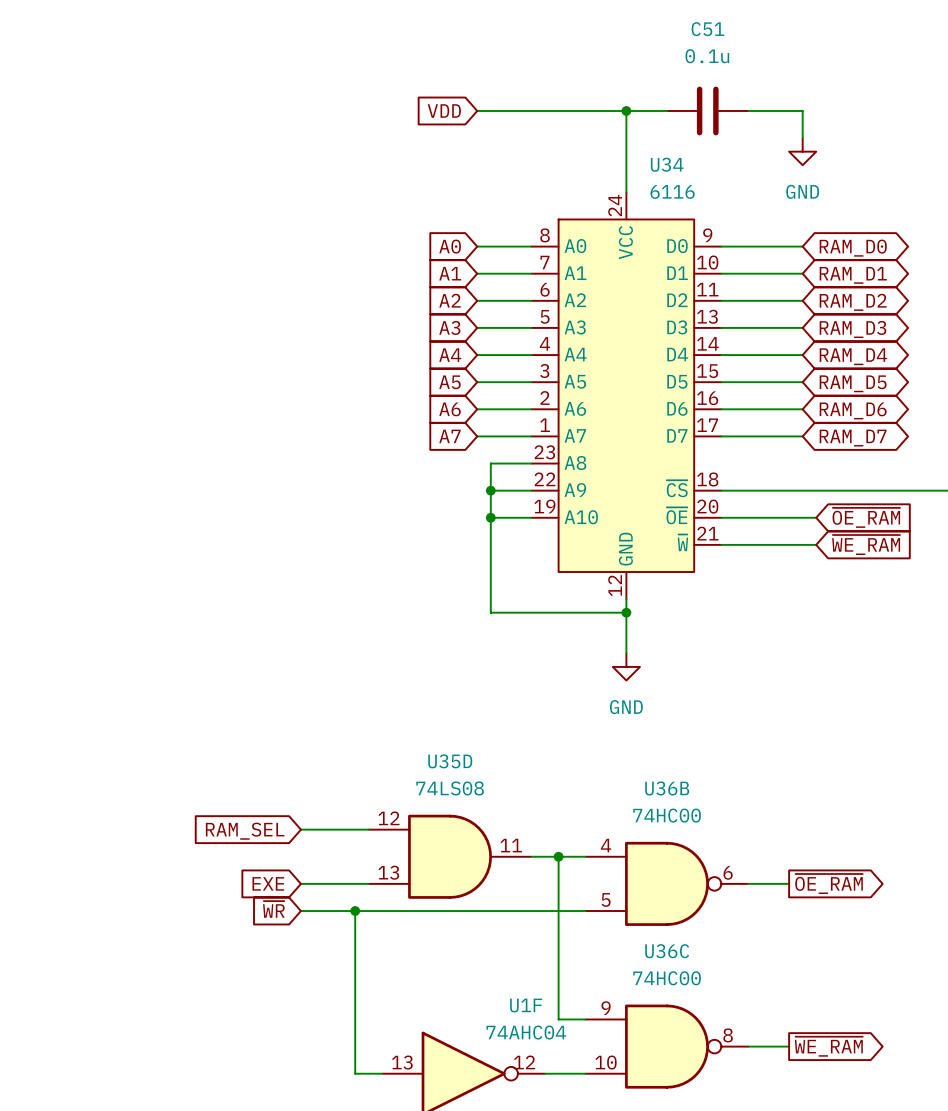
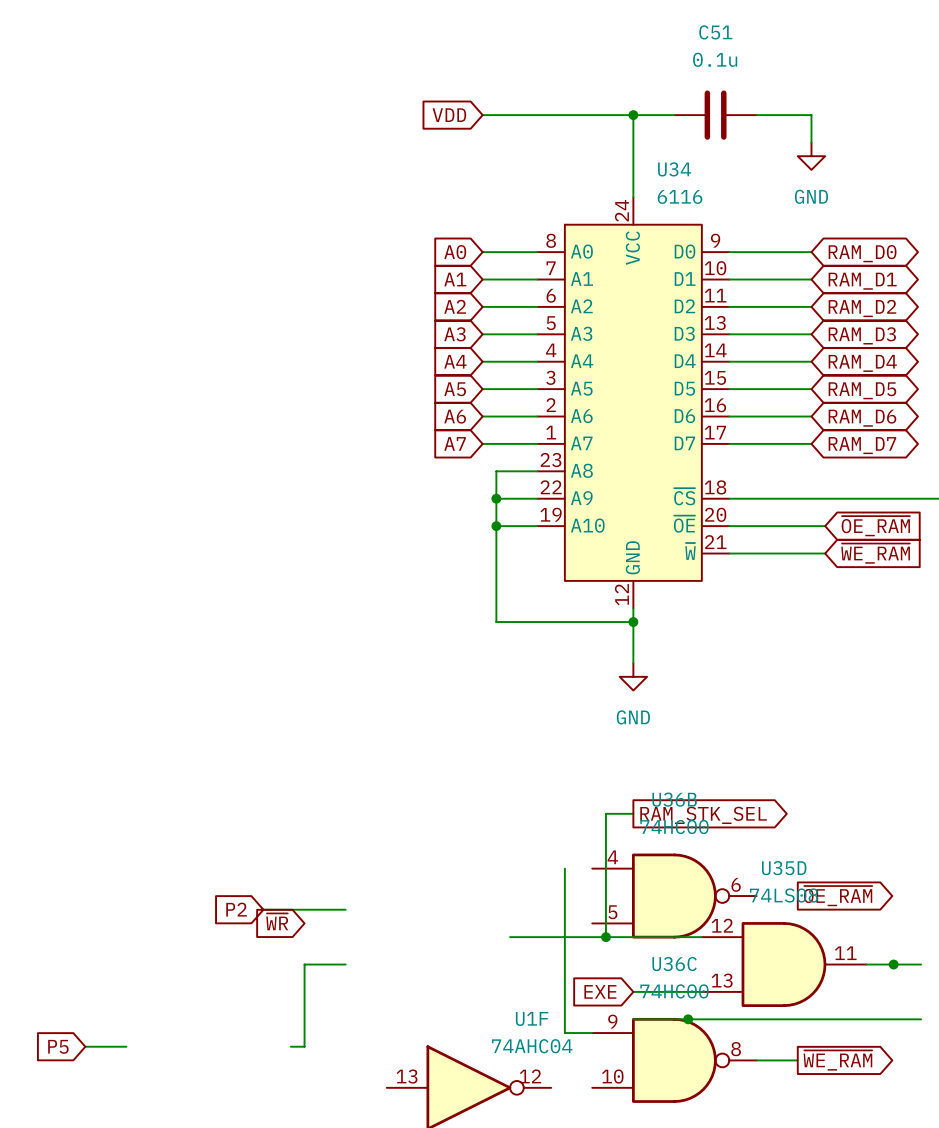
wire: none -> (633, 813) (605, 813) (605, 937)
global label: none -> RAM_STK_SEL (703, 815)
wire: (300, 829) (368, 829) -> none
global label: RAM_SEL (245, 831) -> none
U35D position: (450, 856) -> (784, 964)
wire: (531, 856) (585, 856) -> none
junction: (558, 856) -> none
global label: EXE (268, 883) -> none
wire: (300, 883) (368, 883) -> none
wire: (748, 883) (789, 883) -> none
global label: none -> P2 (236, 909)
wire: none -> (263, 909) (345, 909)
wire: (300, 911) (585, 911) -> none
wire: (355, 911) (355, 1073) (382, 1073) -> none
junction: (355, 911) -> none
wire: none -> (510, 937) (701, 937)
junction: none -> (605, 937)
wire: none -> (345, 964) (304, 964) (304, 1046) (290, 1046)
wire: none -> (866, 964) (921, 964)
junction: none -> (893, 964)
global label: none -> EXE (600, 991)
wire: none -> (633, 991) (701, 991)
wire: none -> (633, 1019) (921, 1019)
junction: none -> (688, 1019)
global label: none -> P5 (58, 1046)
wire: none -> (85, 1046) (126, 1046)
wire: (545, 1073) (585, 1073) -> none

